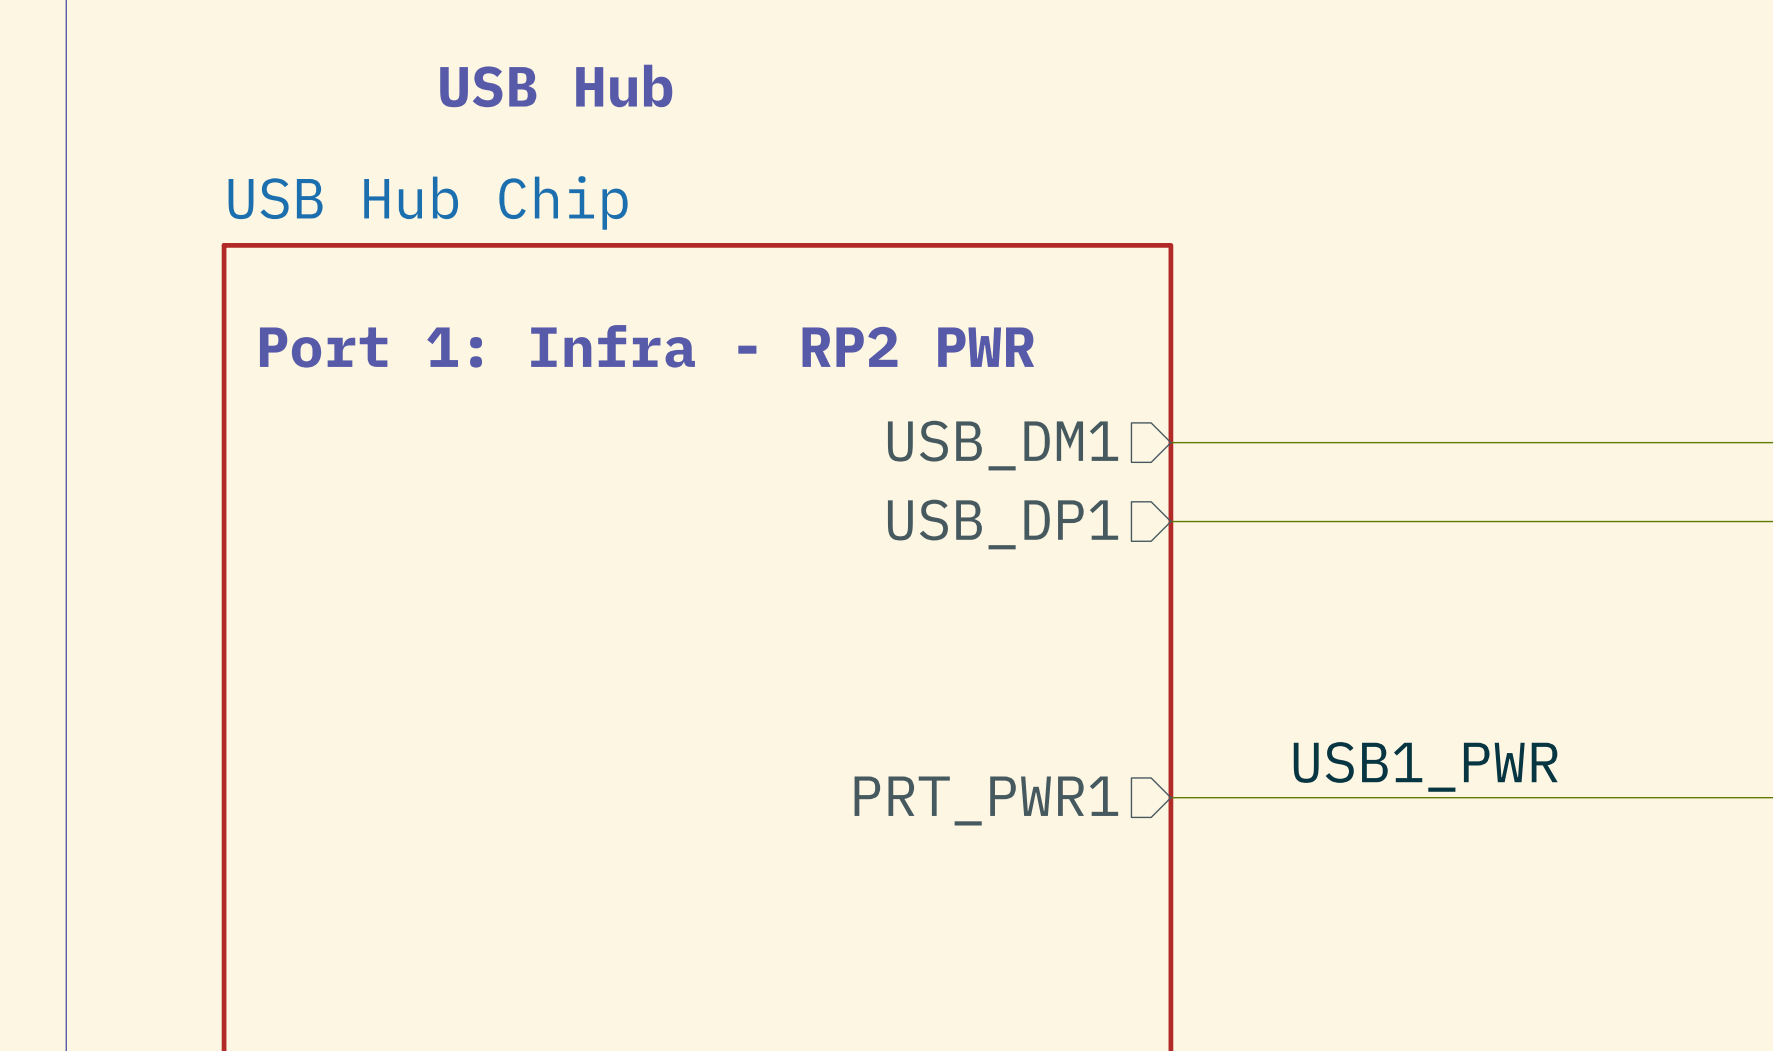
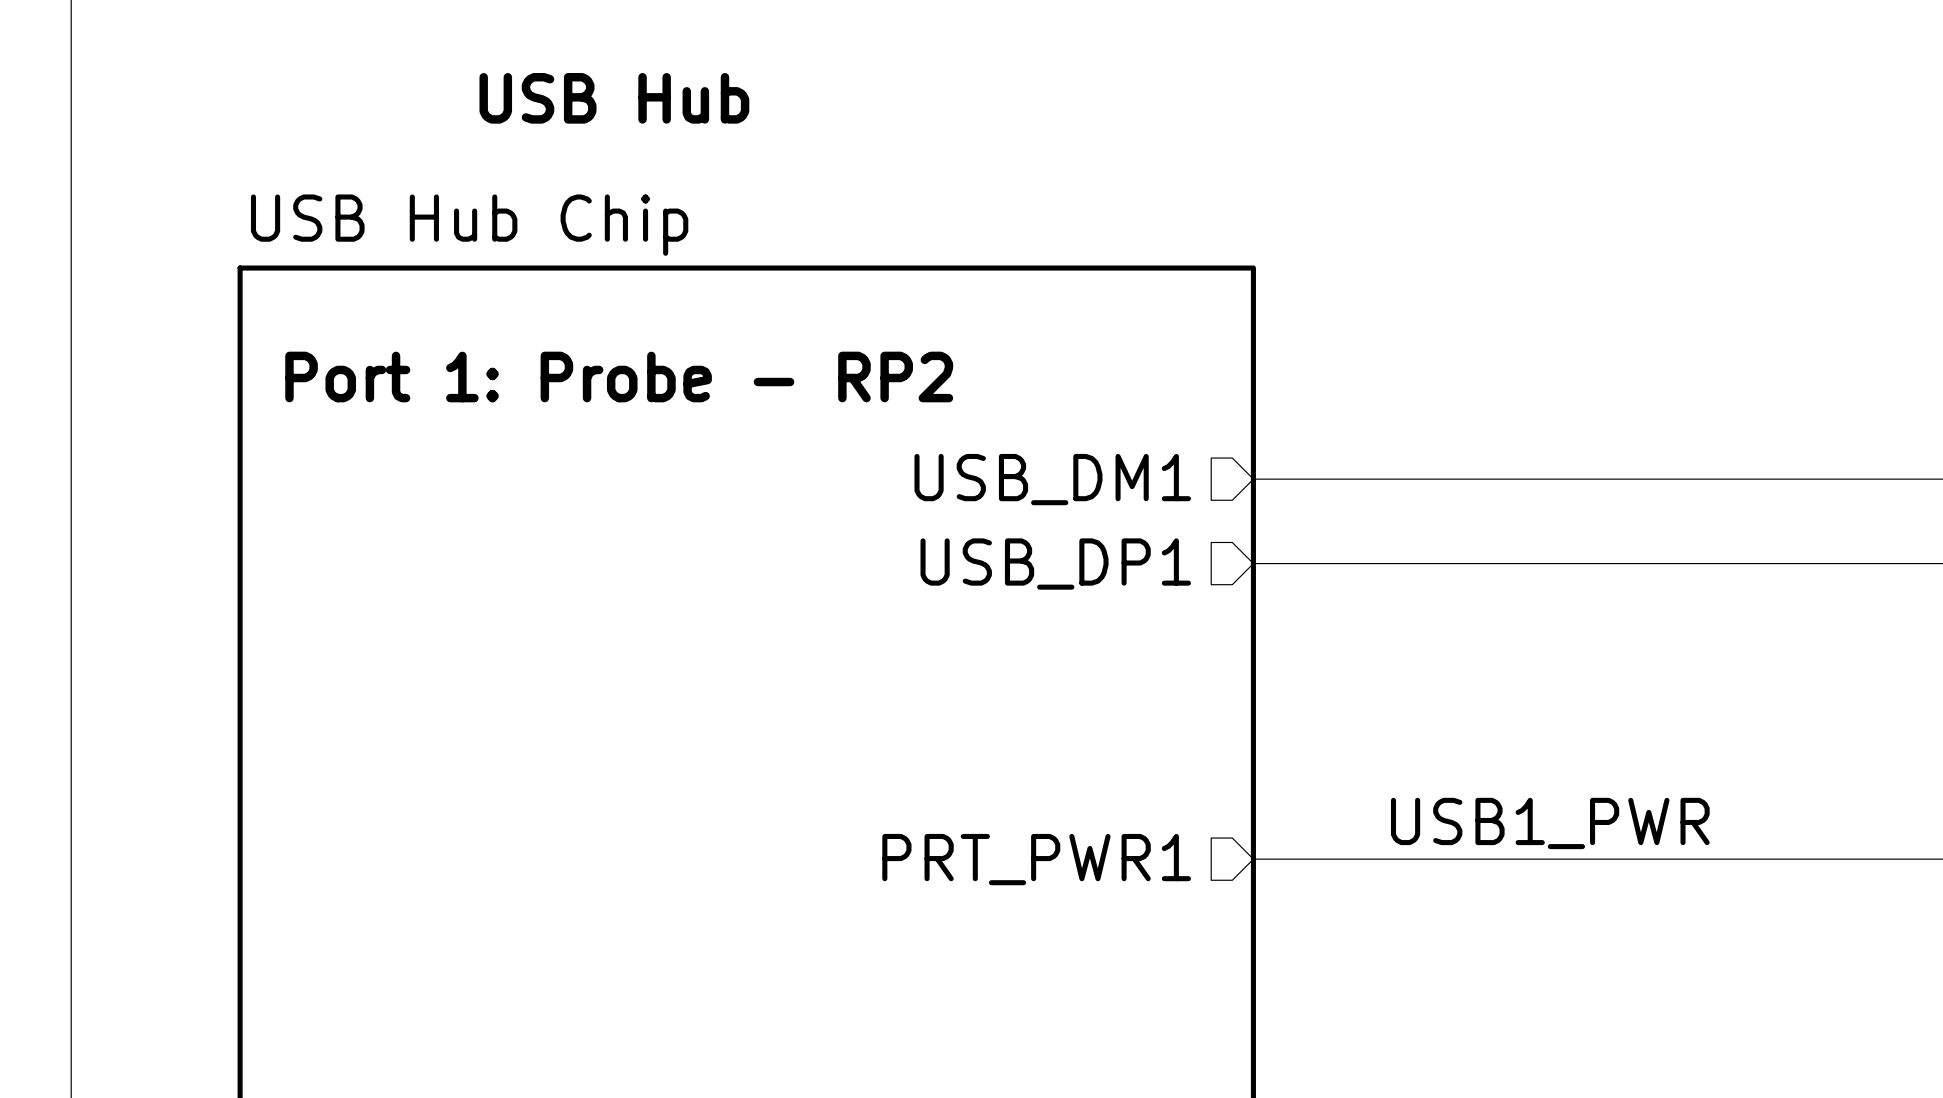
text: Port 1: Infra - RP2 PWR (647, 346) -> Port 1: Probe - RP2 (619, 377)

